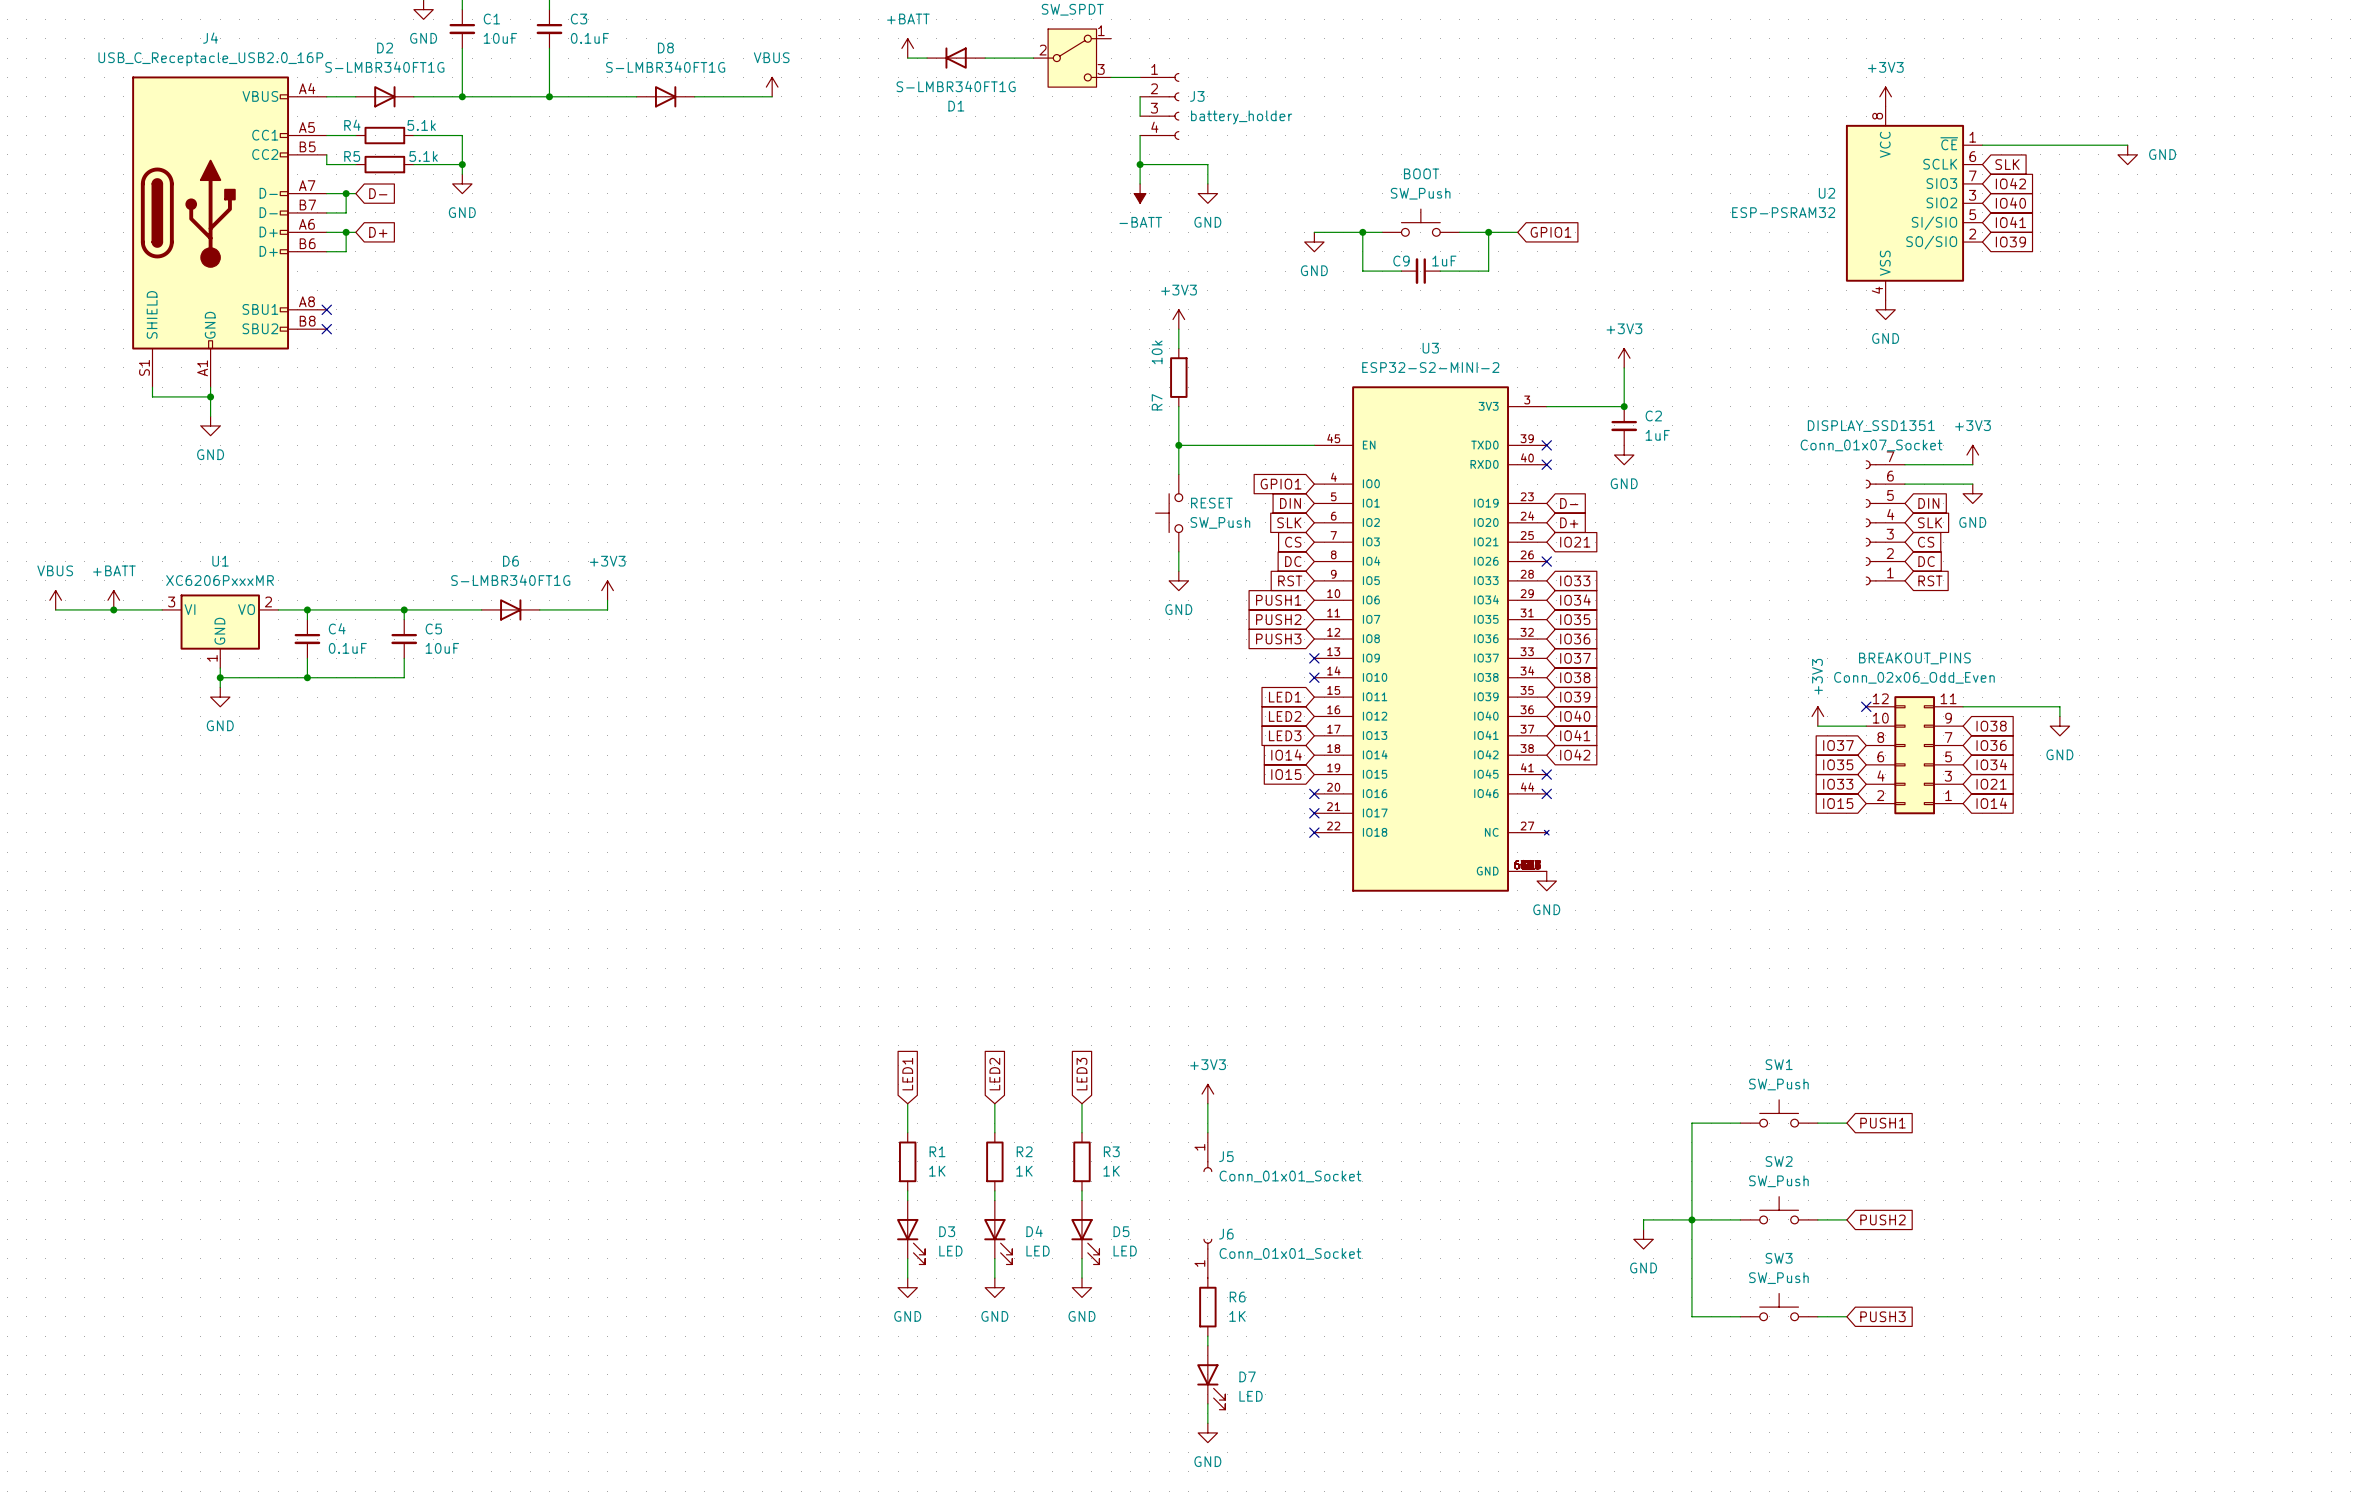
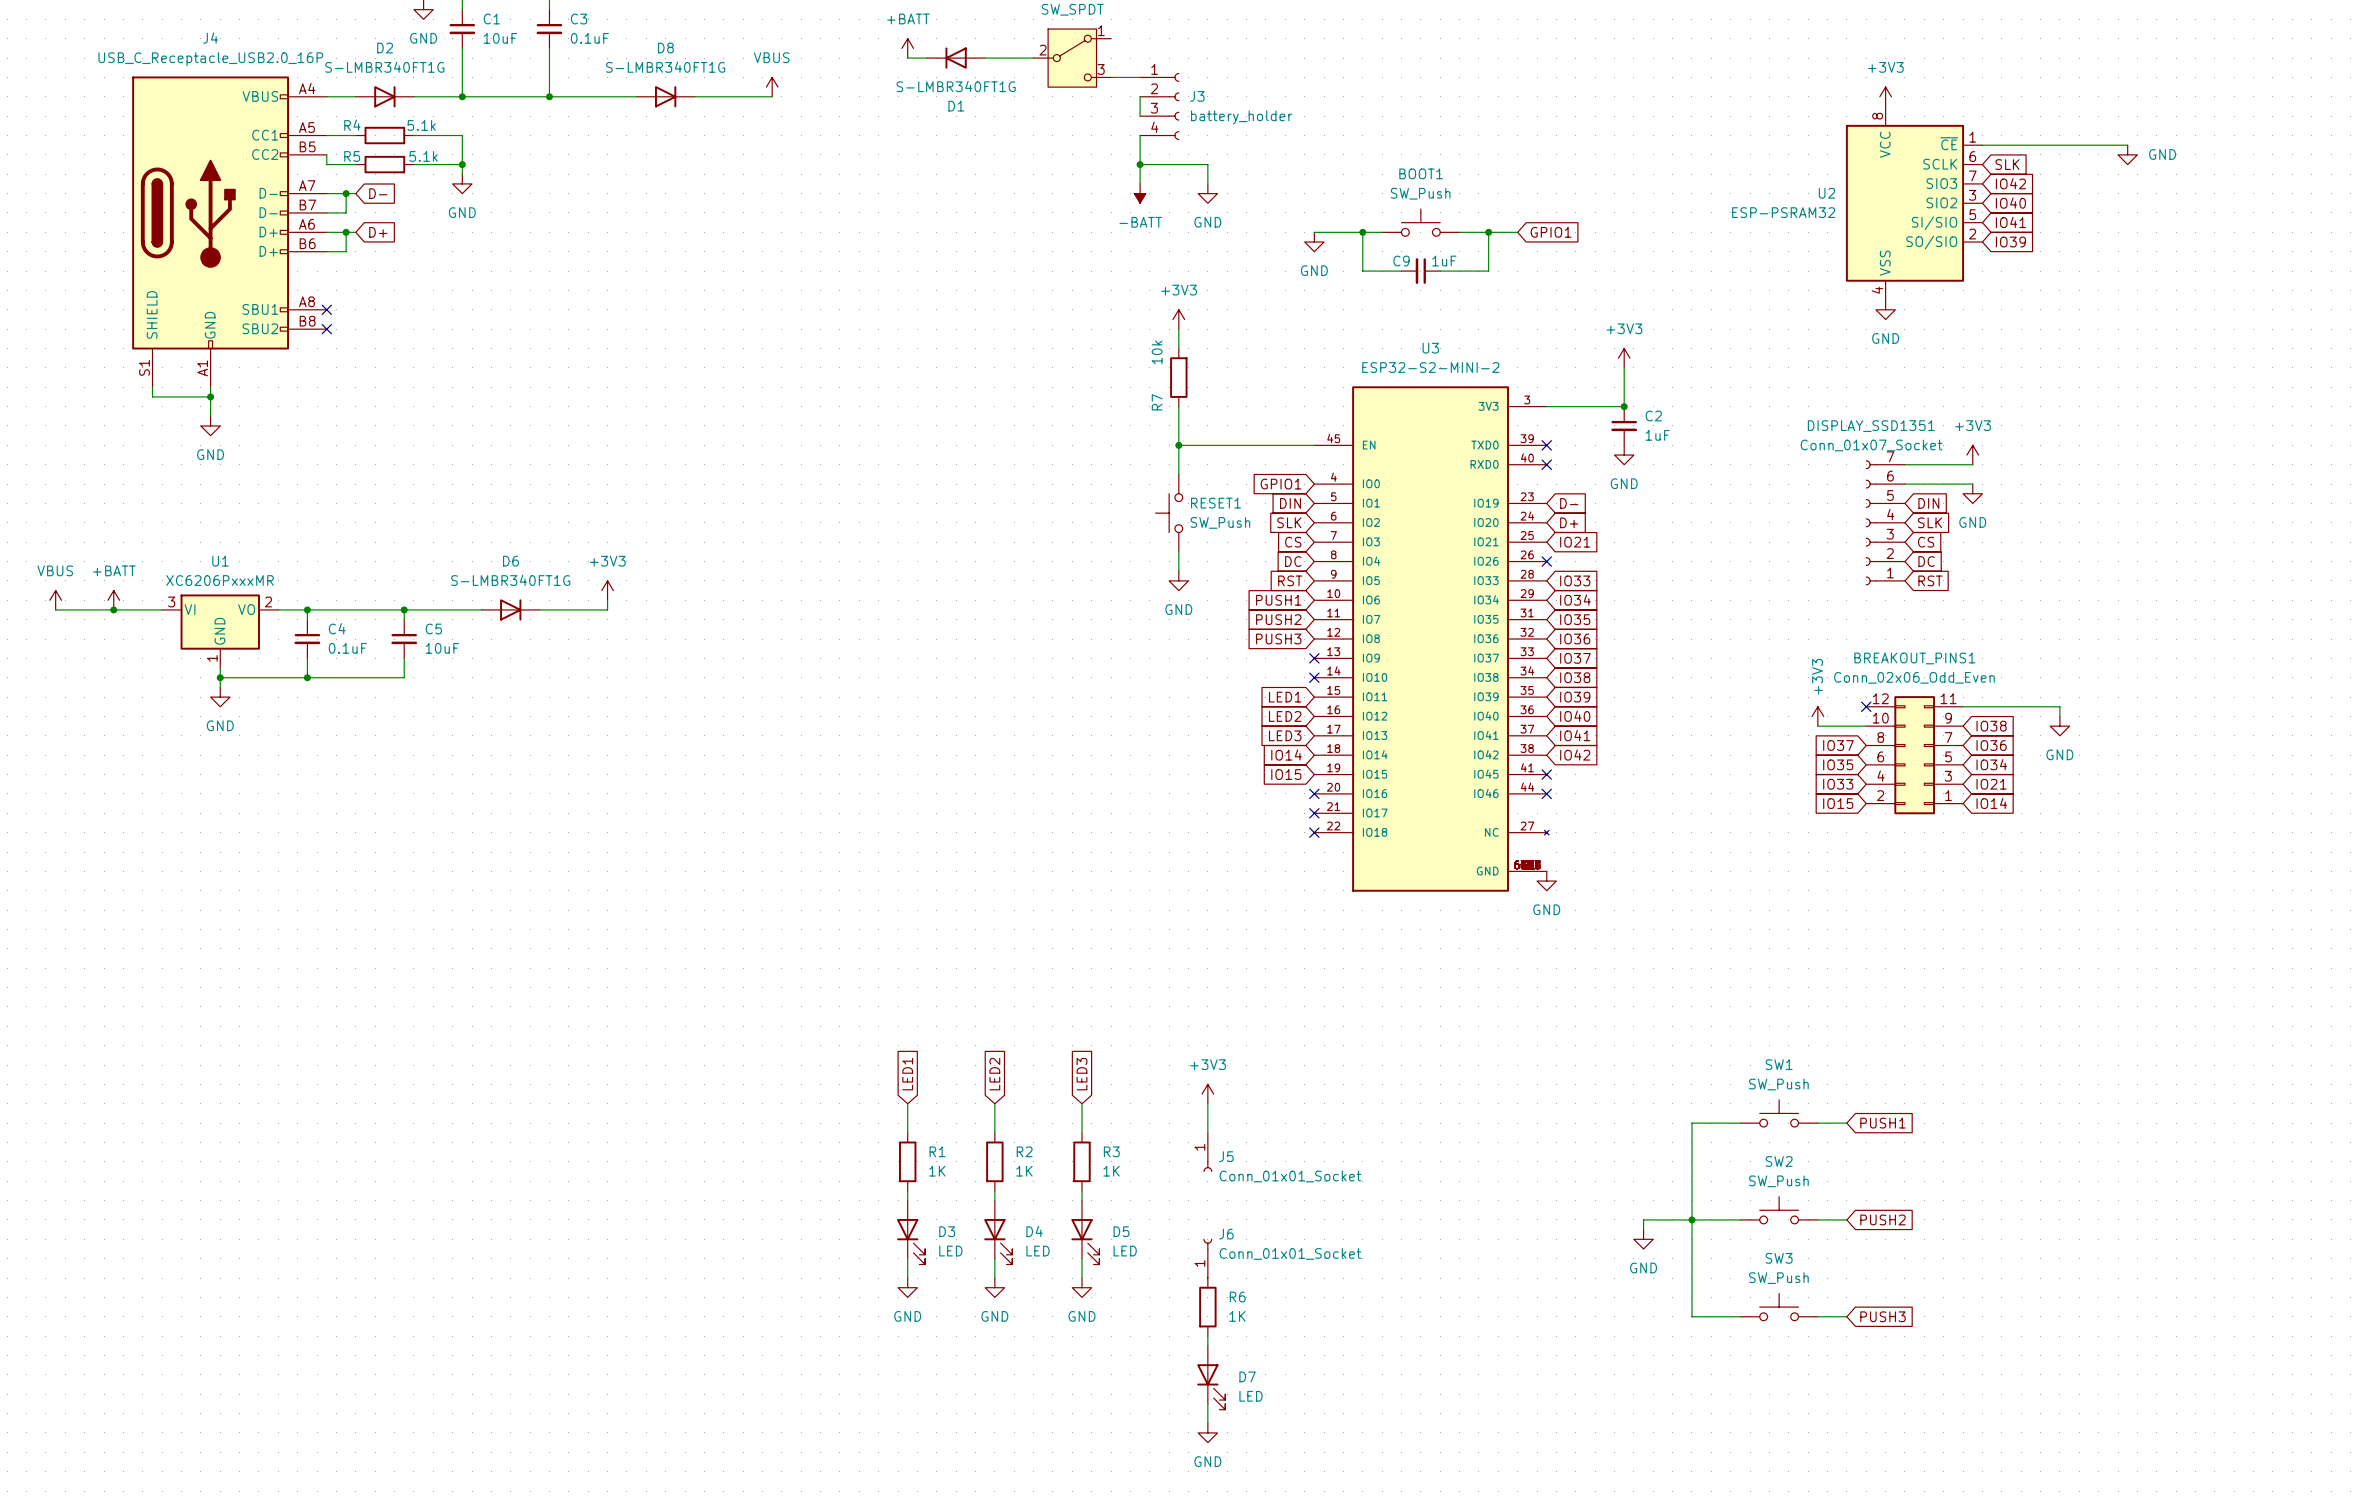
BOOT name: BOOT (1421, 173) -> BOOT1 (1421, 173)
RESET name: RESET (1211, 503) -> RESET1 (1216, 503)
BREAKOUT_PINS name: BREAKOUT_PINS (1914, 658) -> BREAKOUT_PINS1 (1914, 658)

